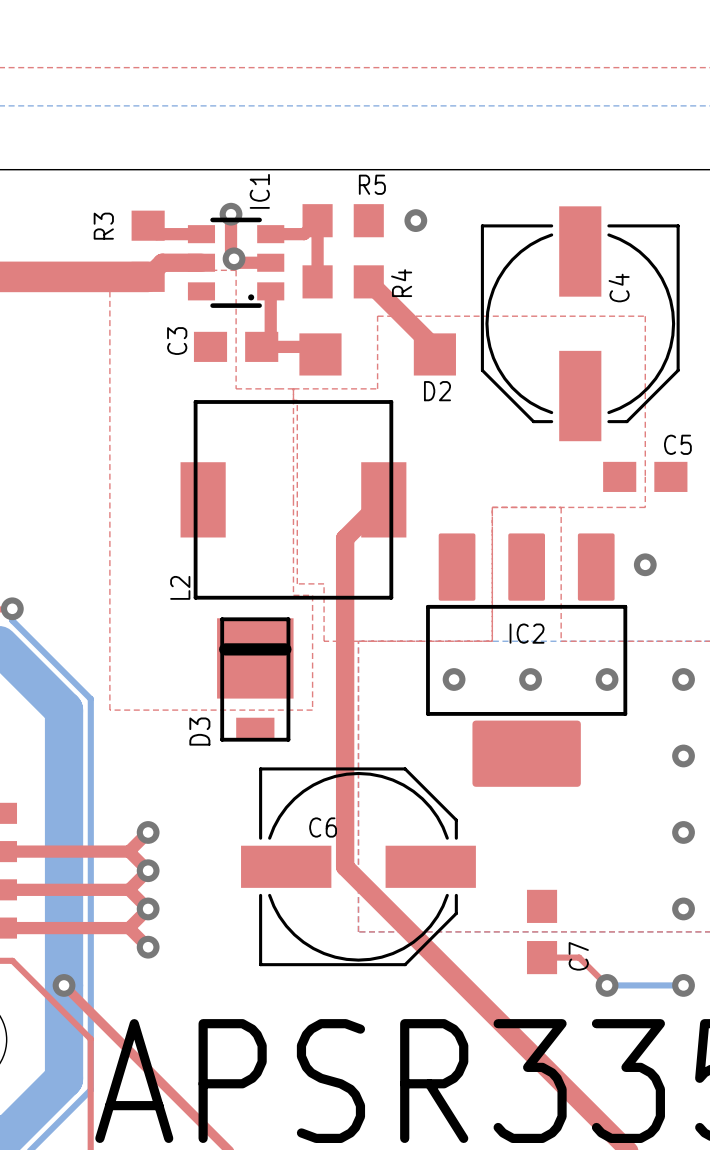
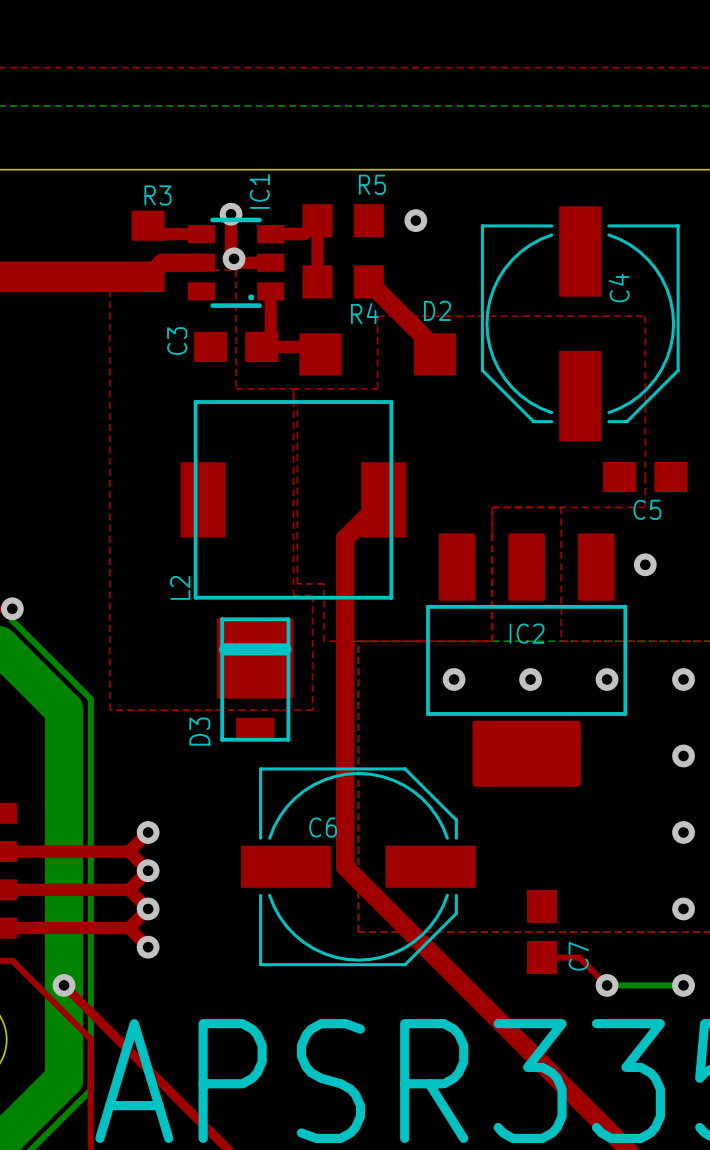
R3 name rotation: 0° (103, 226) -> 90° clockwise (157, 195)
R3 name position: R3 (103, 226) -> R3 (157, 195)
R4 name rotation: 0° (401, 283) -> 90° clockwise (364, 313)
R4 name position: R4 (401, 283) -> R4 (364, 313)
D2 name position: D2 (437, 391) -> D2 (437, 310)
C5 name position: C5 (677, 444) -> C5 (647, 509)

